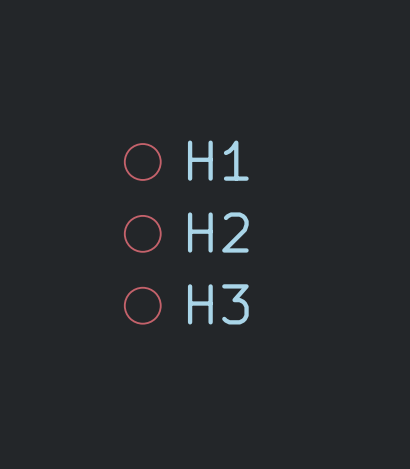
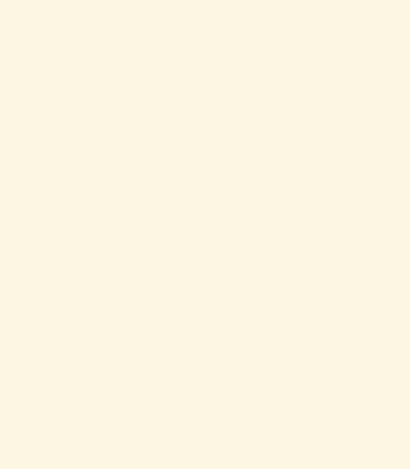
H1: (142, 161) -> none
H2: (142, 233) -> none
H3: (142, 305) -> none

